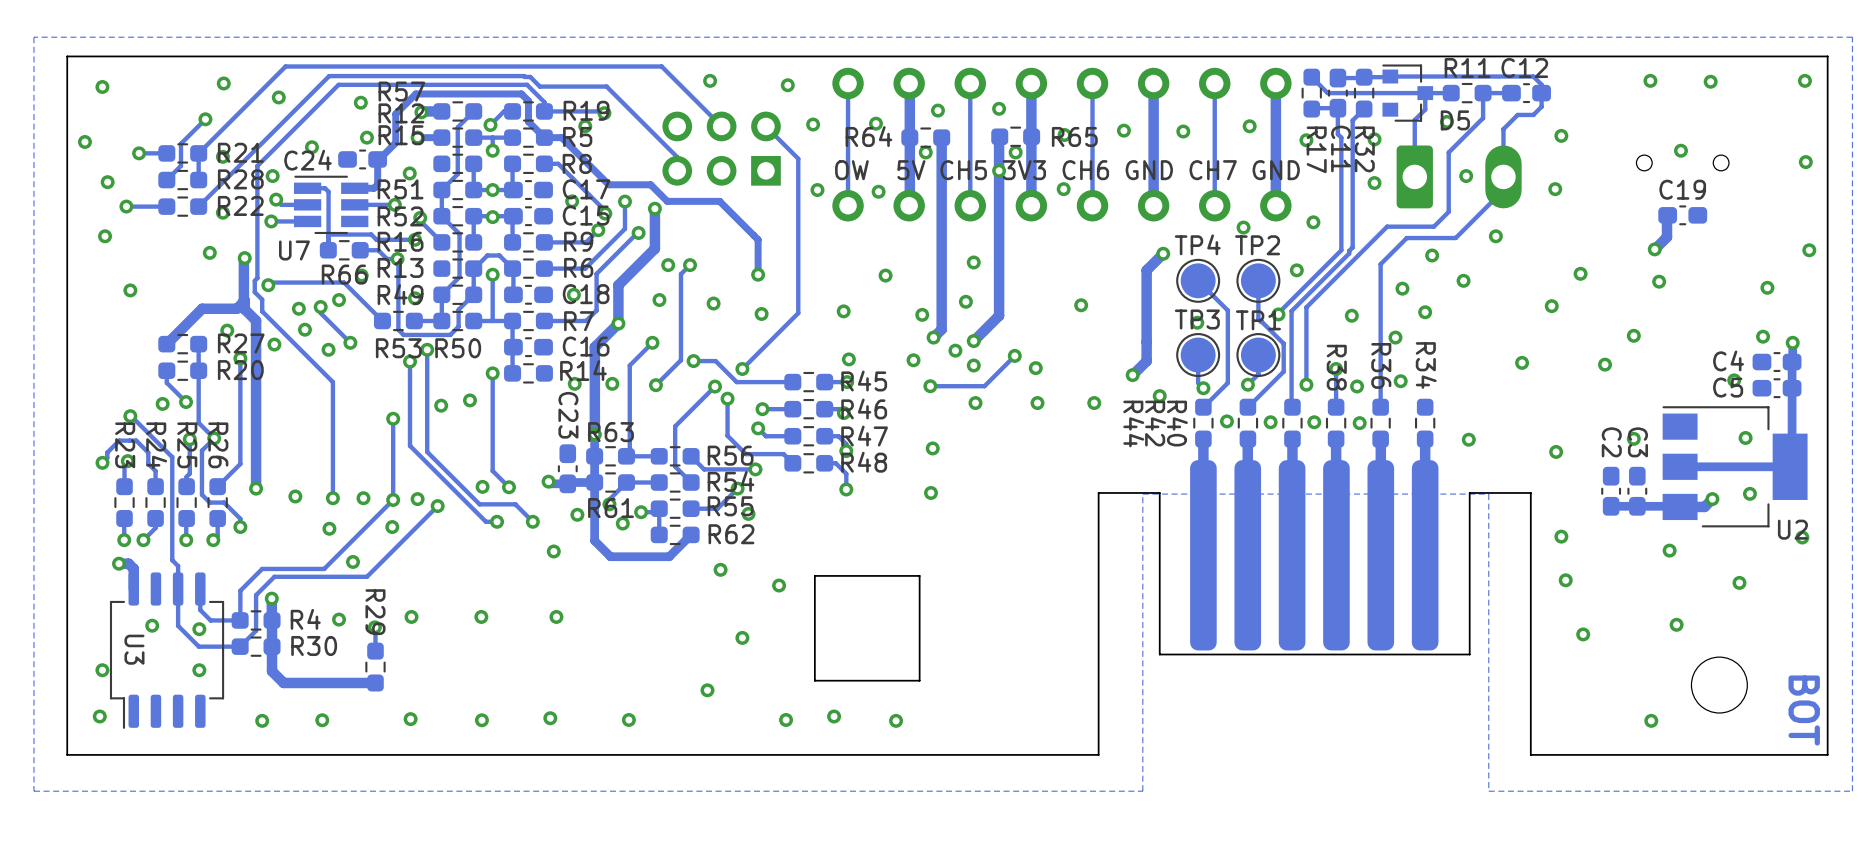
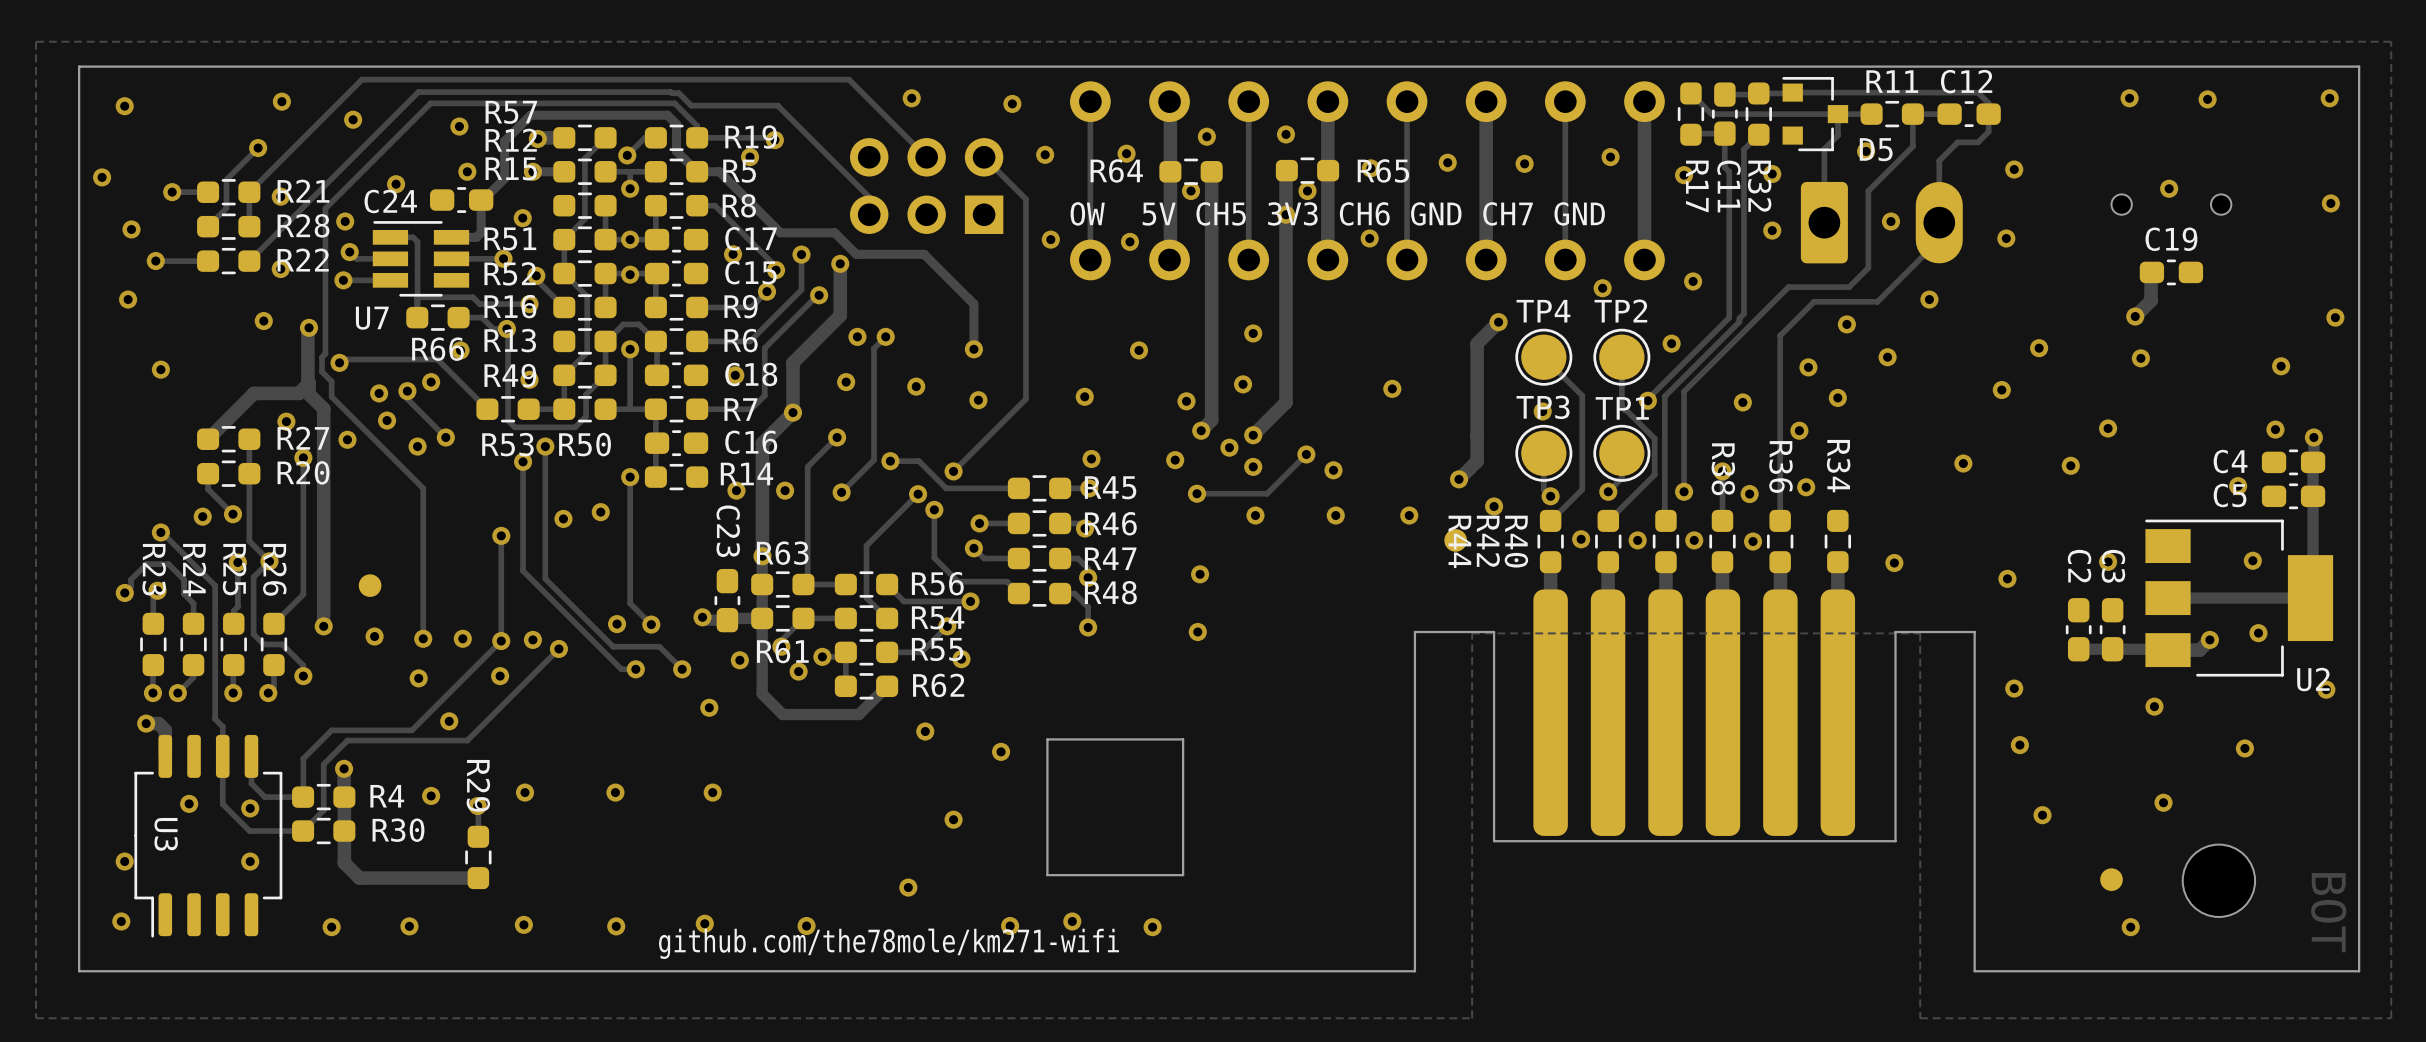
part: none -> (1455, 540)
part: none -> (370, 585)
part: none -> (2111, 879)
text: none -> github.com/the78mole/km271-wifi (889, 943)

